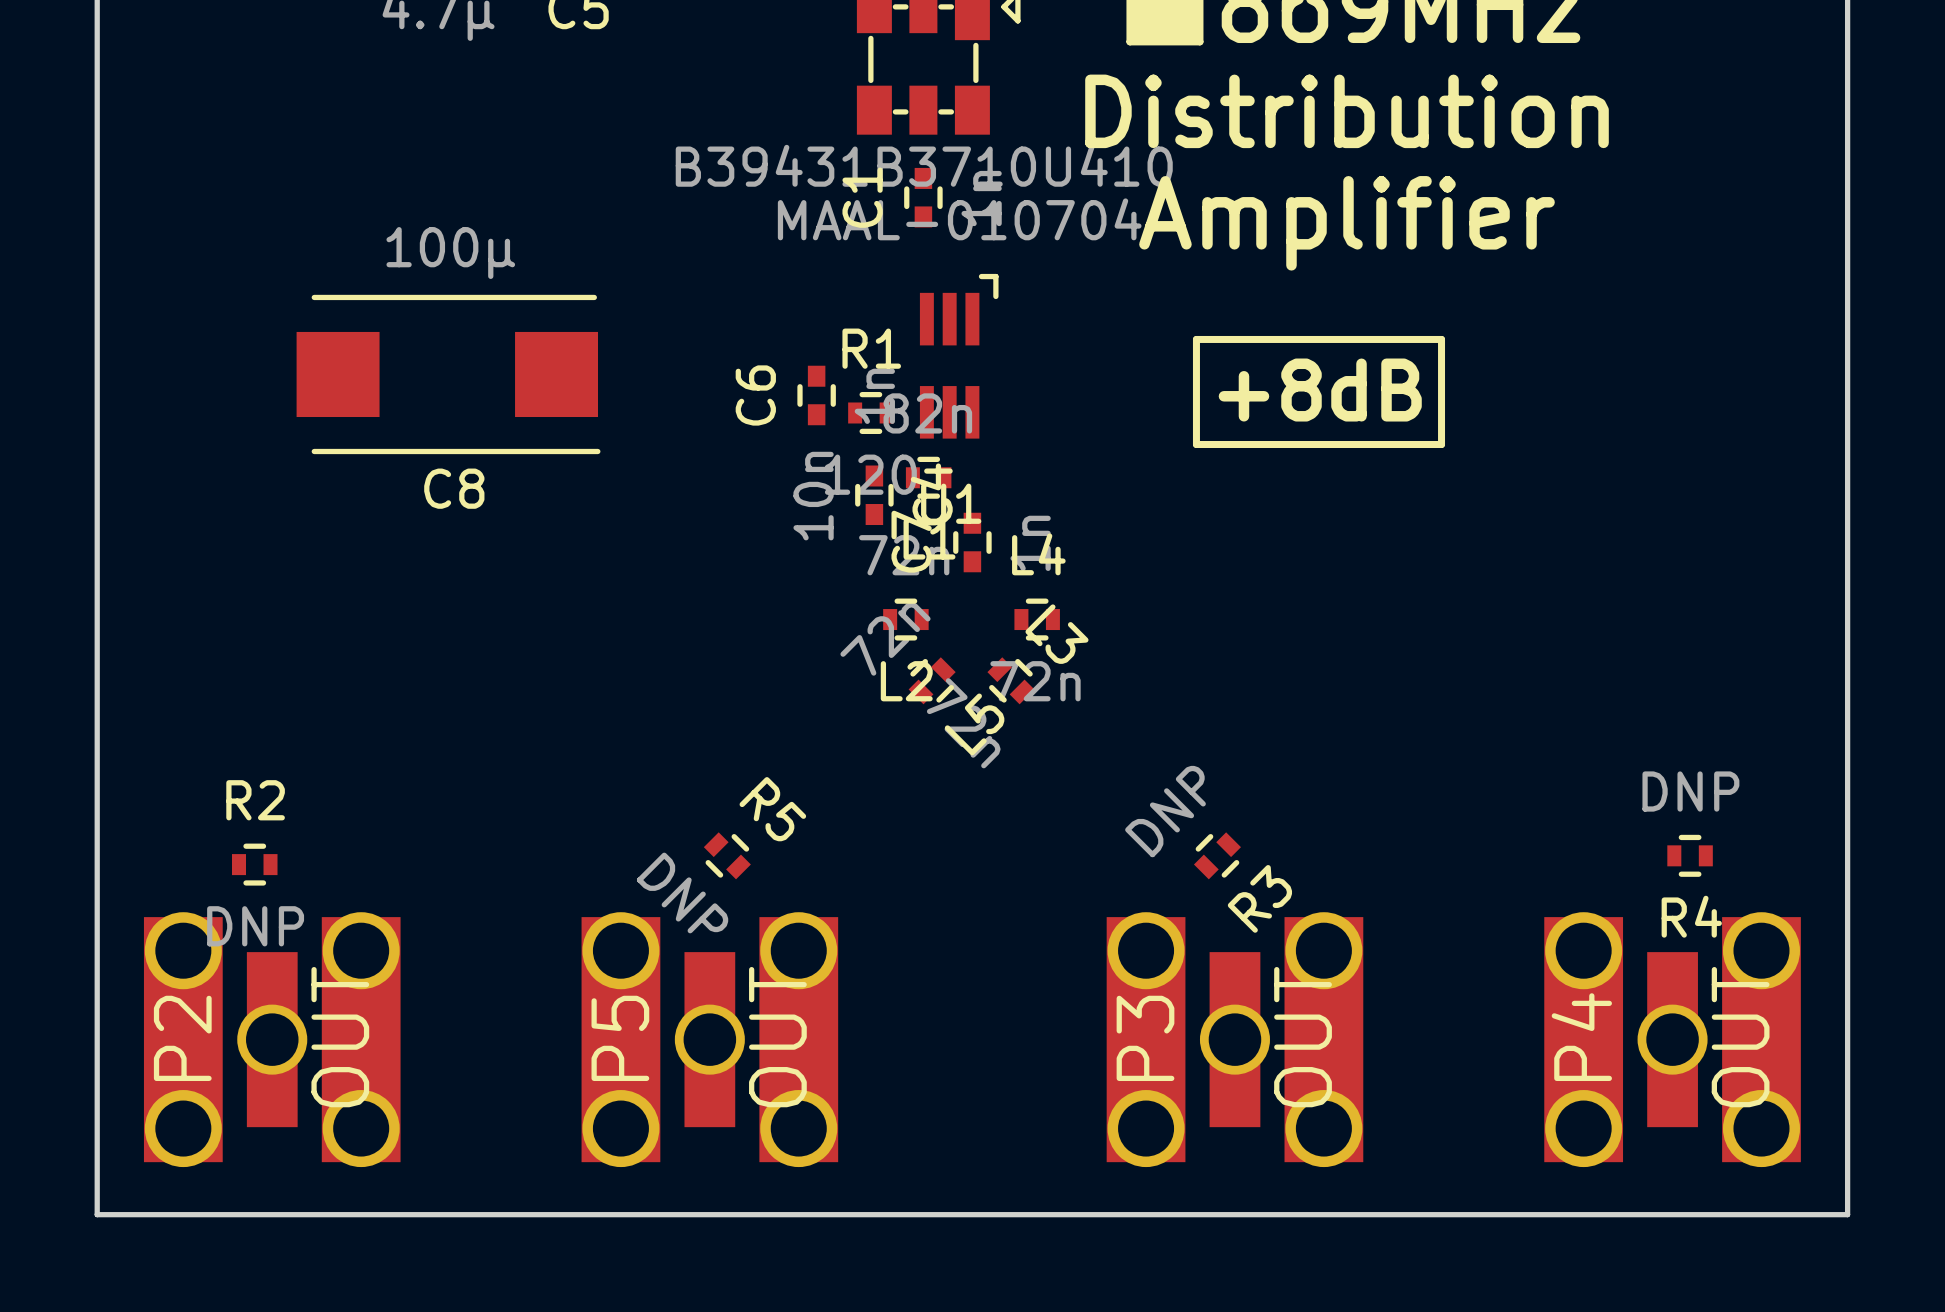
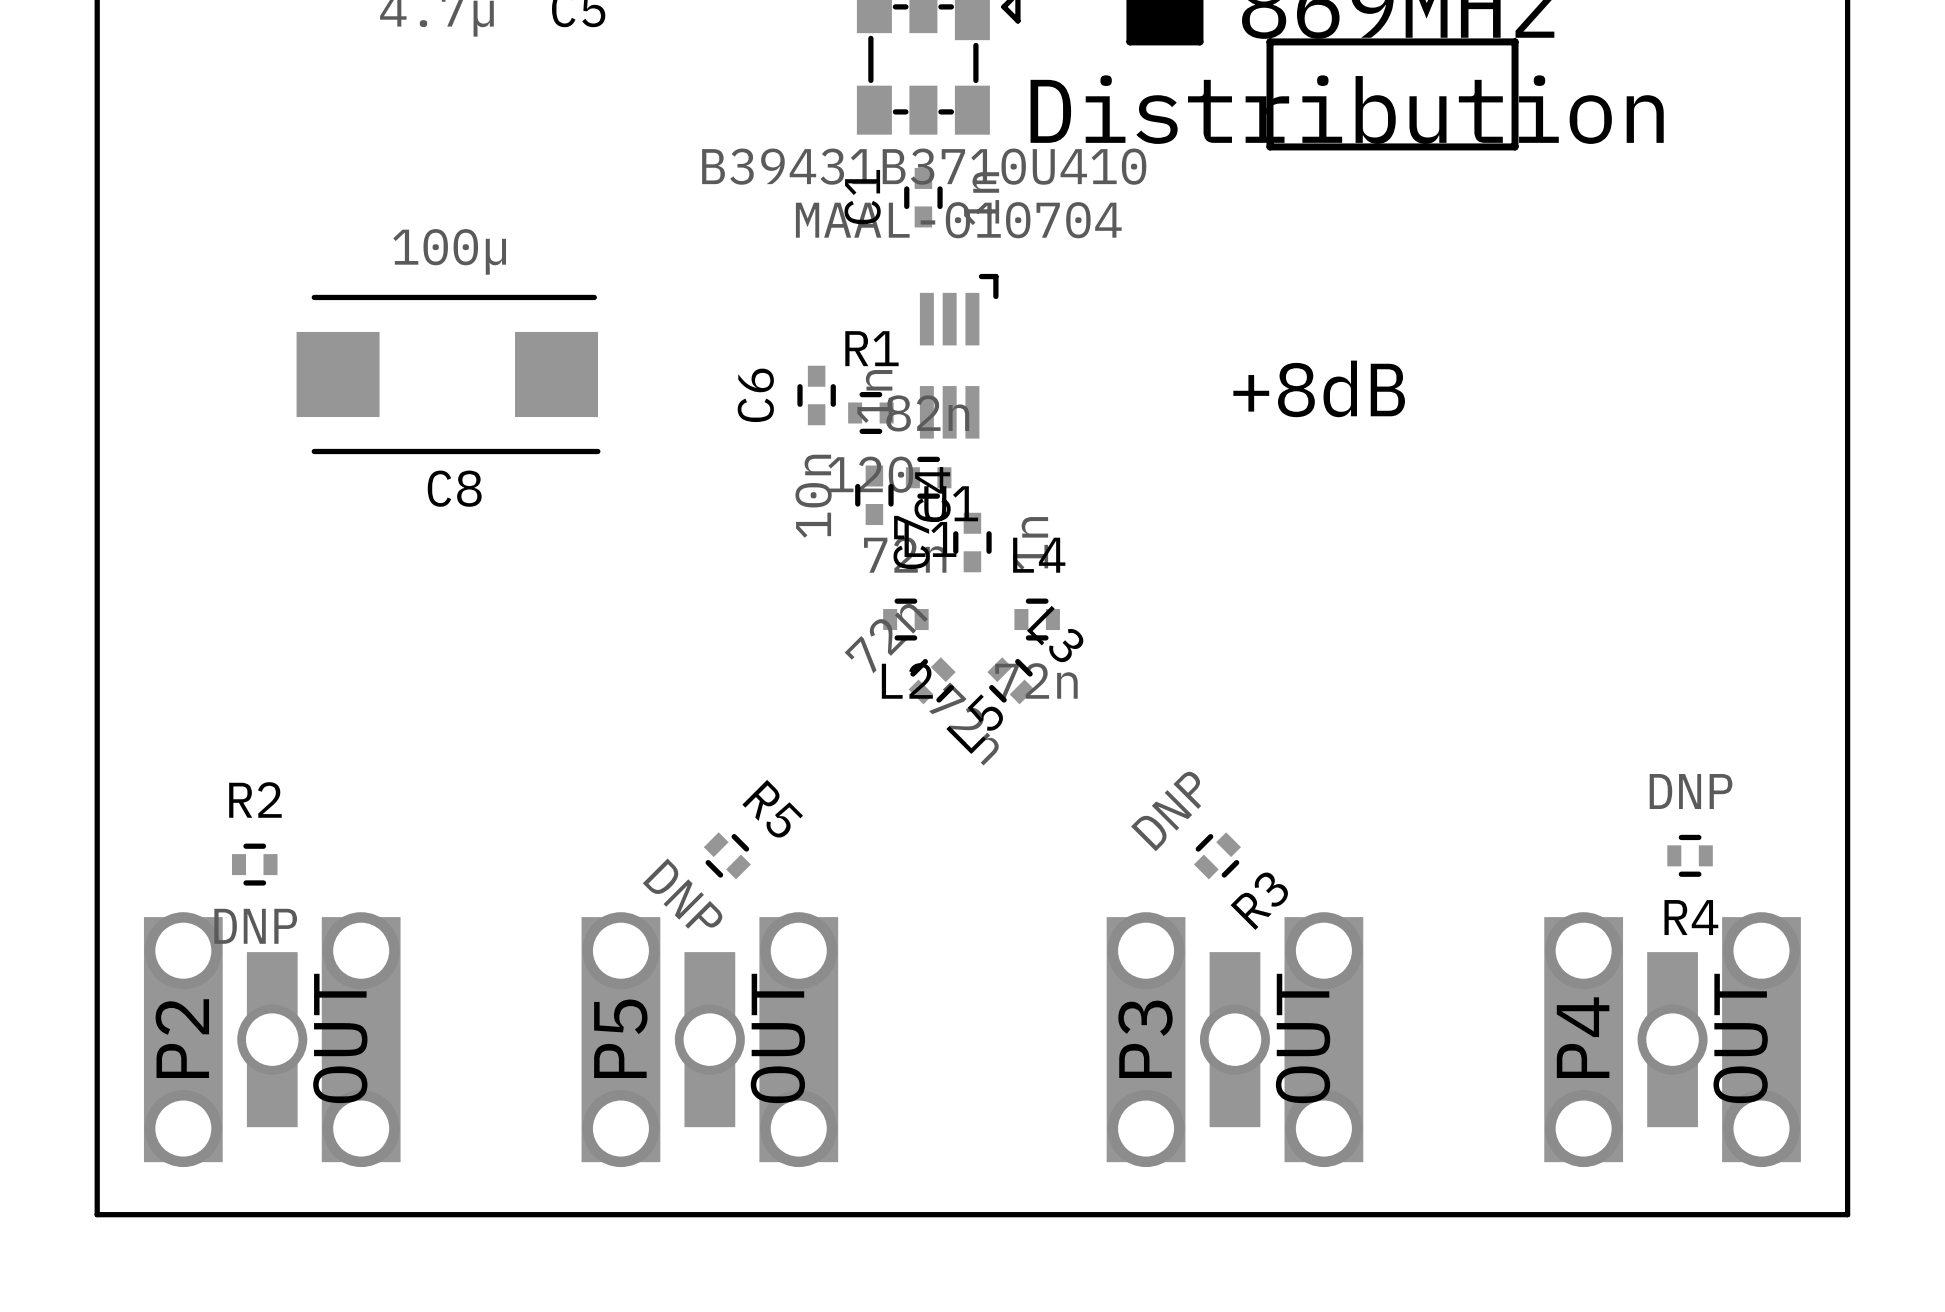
text: Amplifier (1347, 223) -> none
line: (1196, 339) (1196, 444) (1441, 444) (1441, 339) (1196, 339) -> (1269, 41) (1269, 146) (1515, 146) (1515, 41) (1269, 41)

